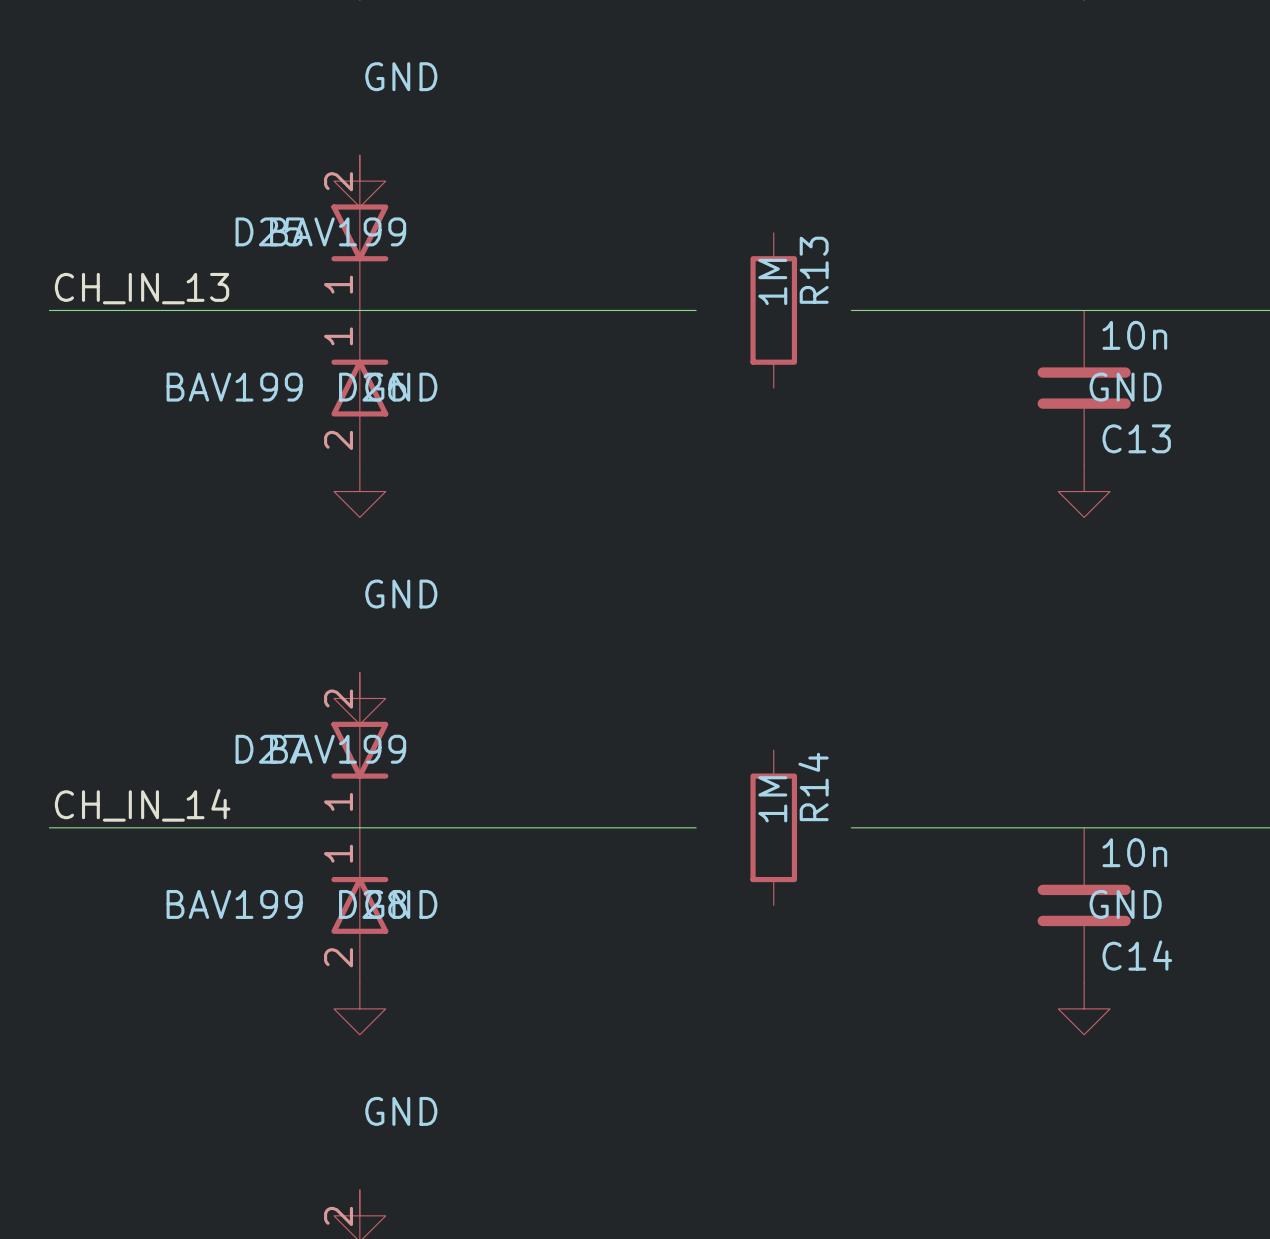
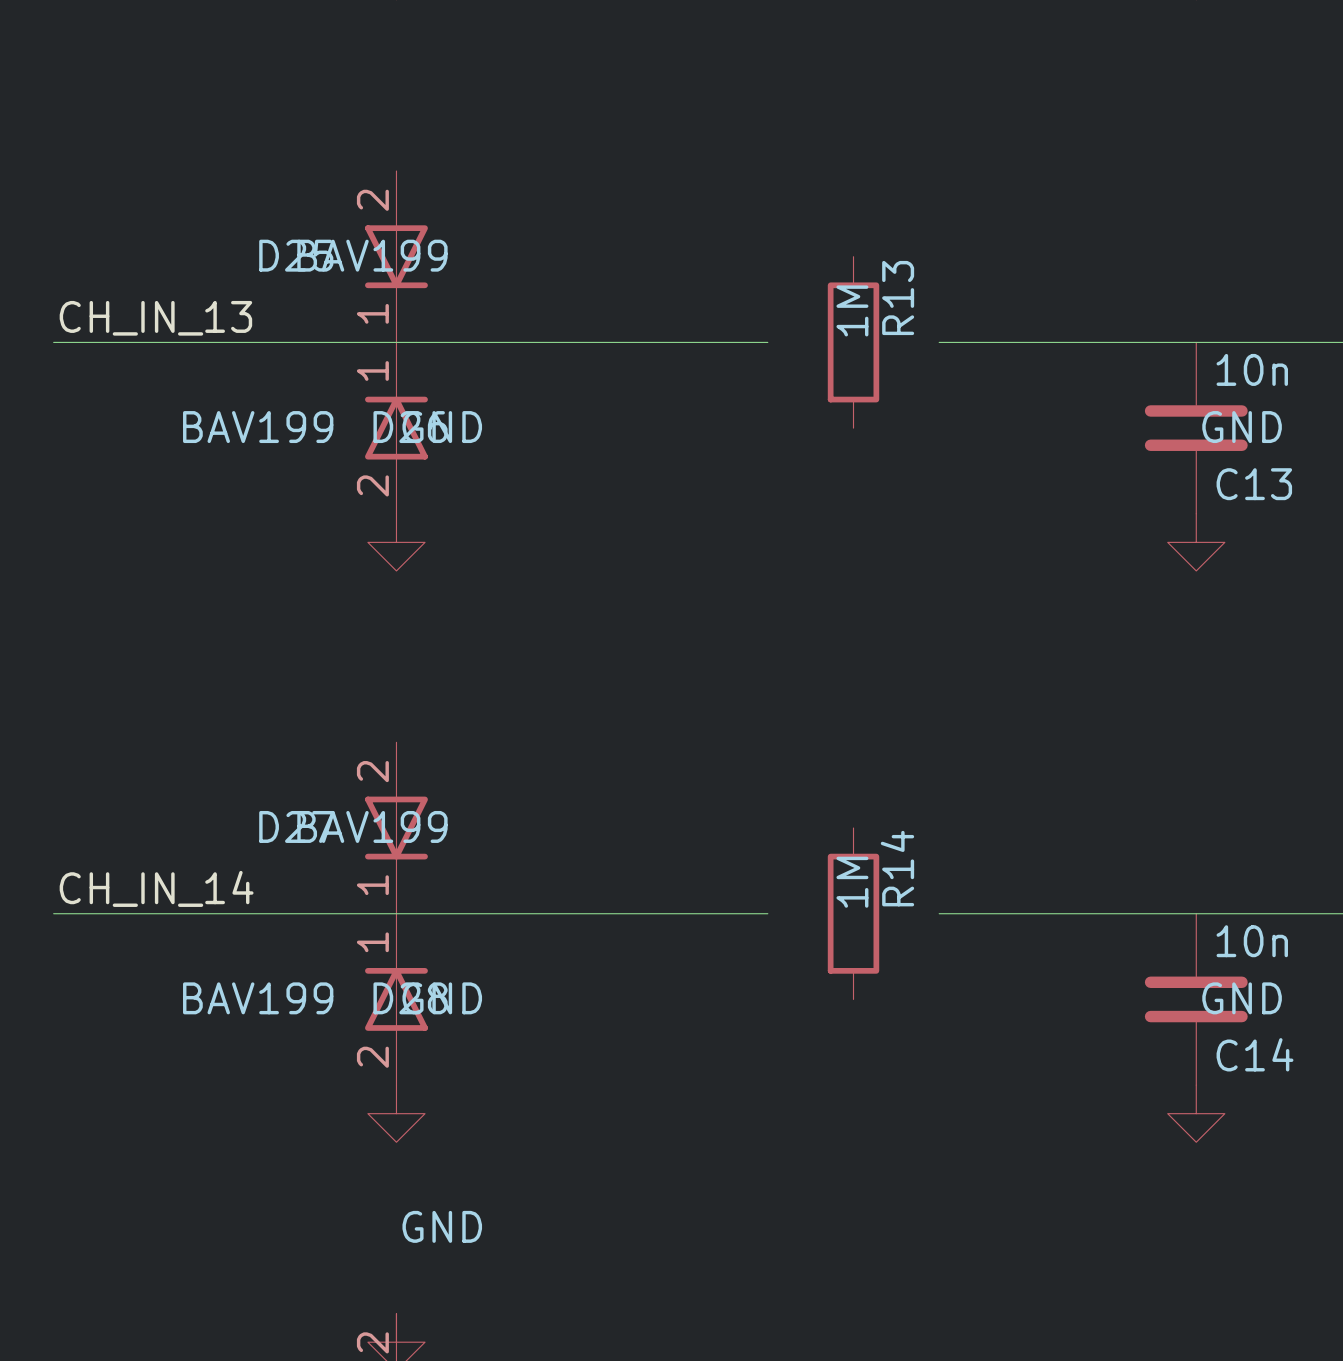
power symbol: GND (359, 181) -> none
power symbol: GND (359, 698) -> none

